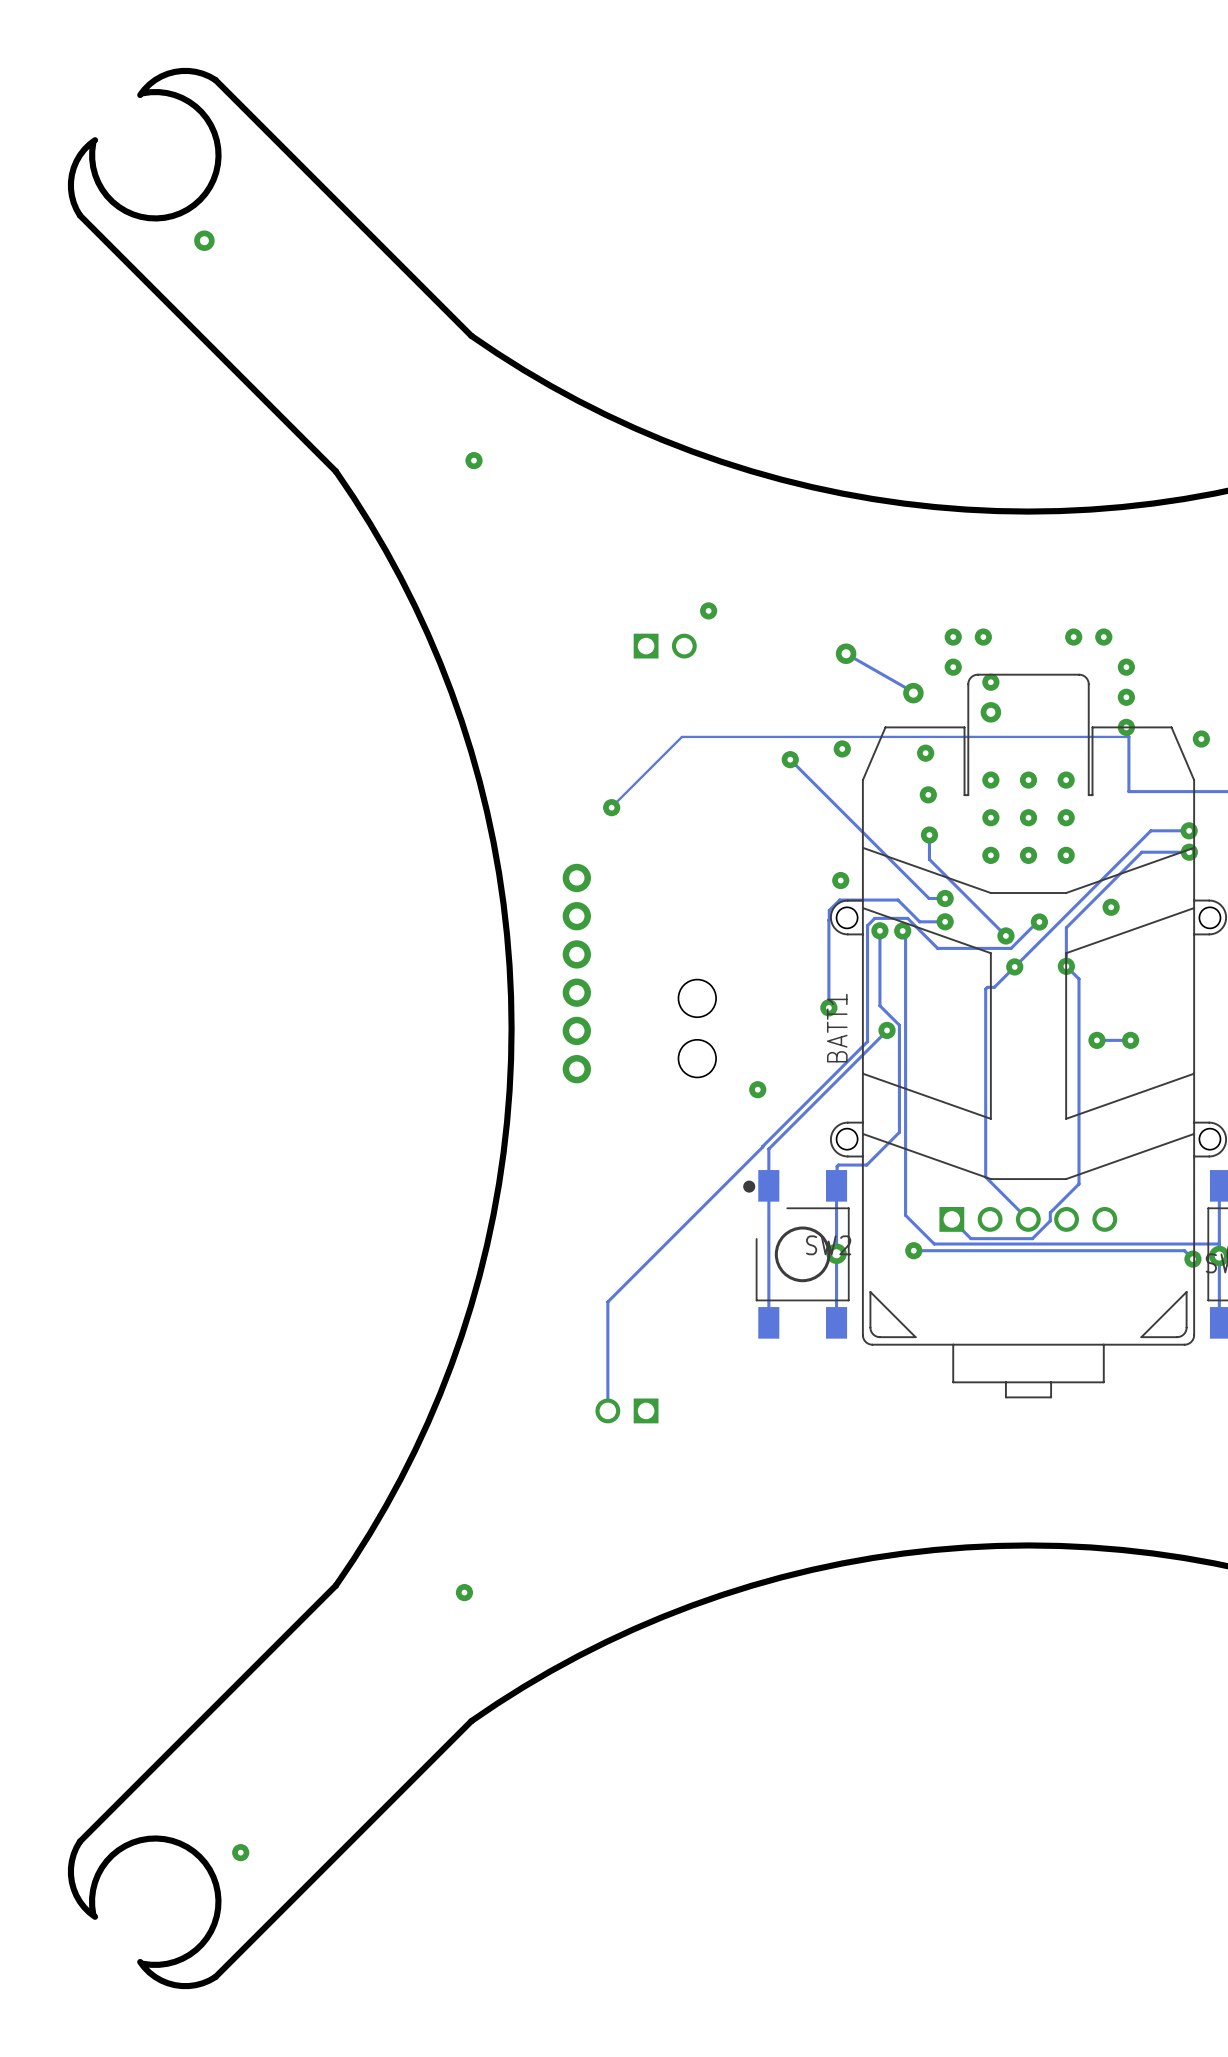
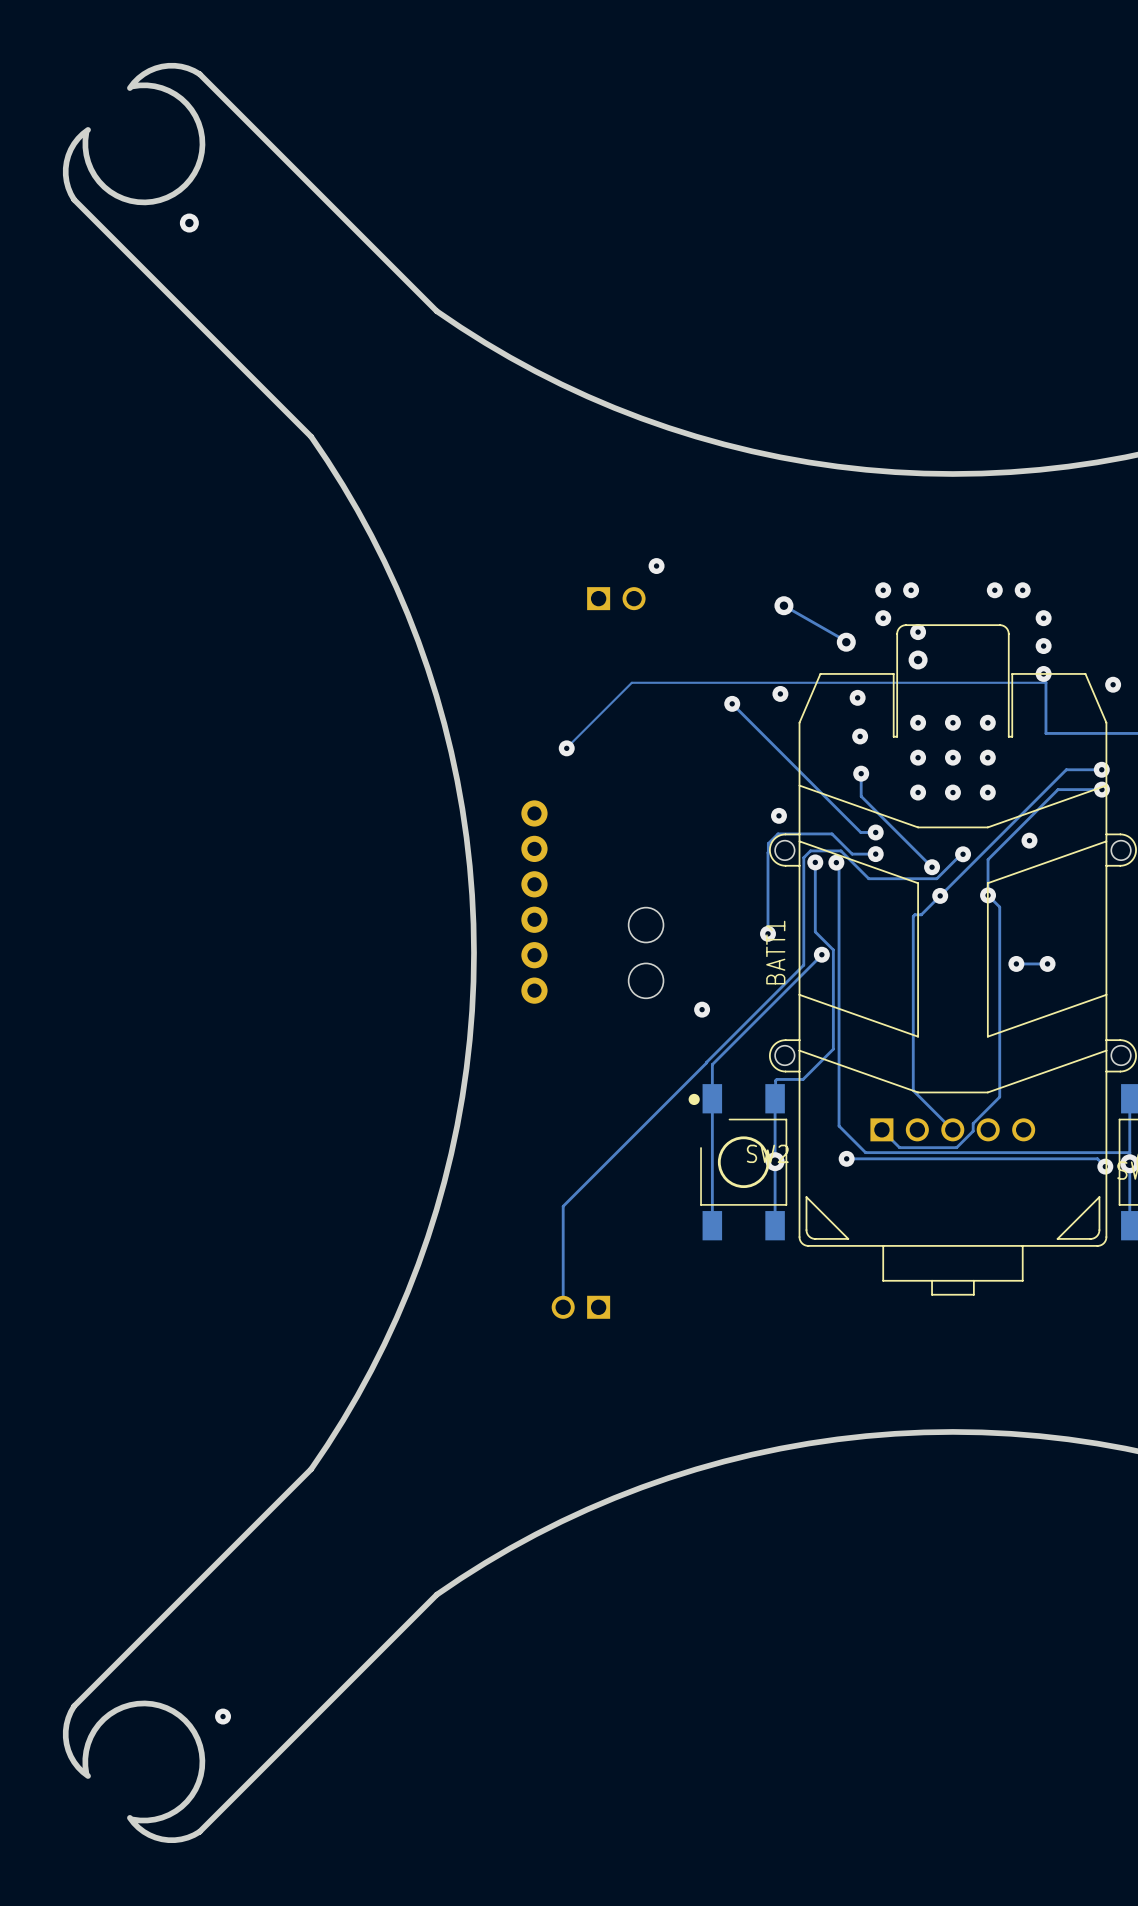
via: (474, 460) -> none
via: (464, 1592) -> none

